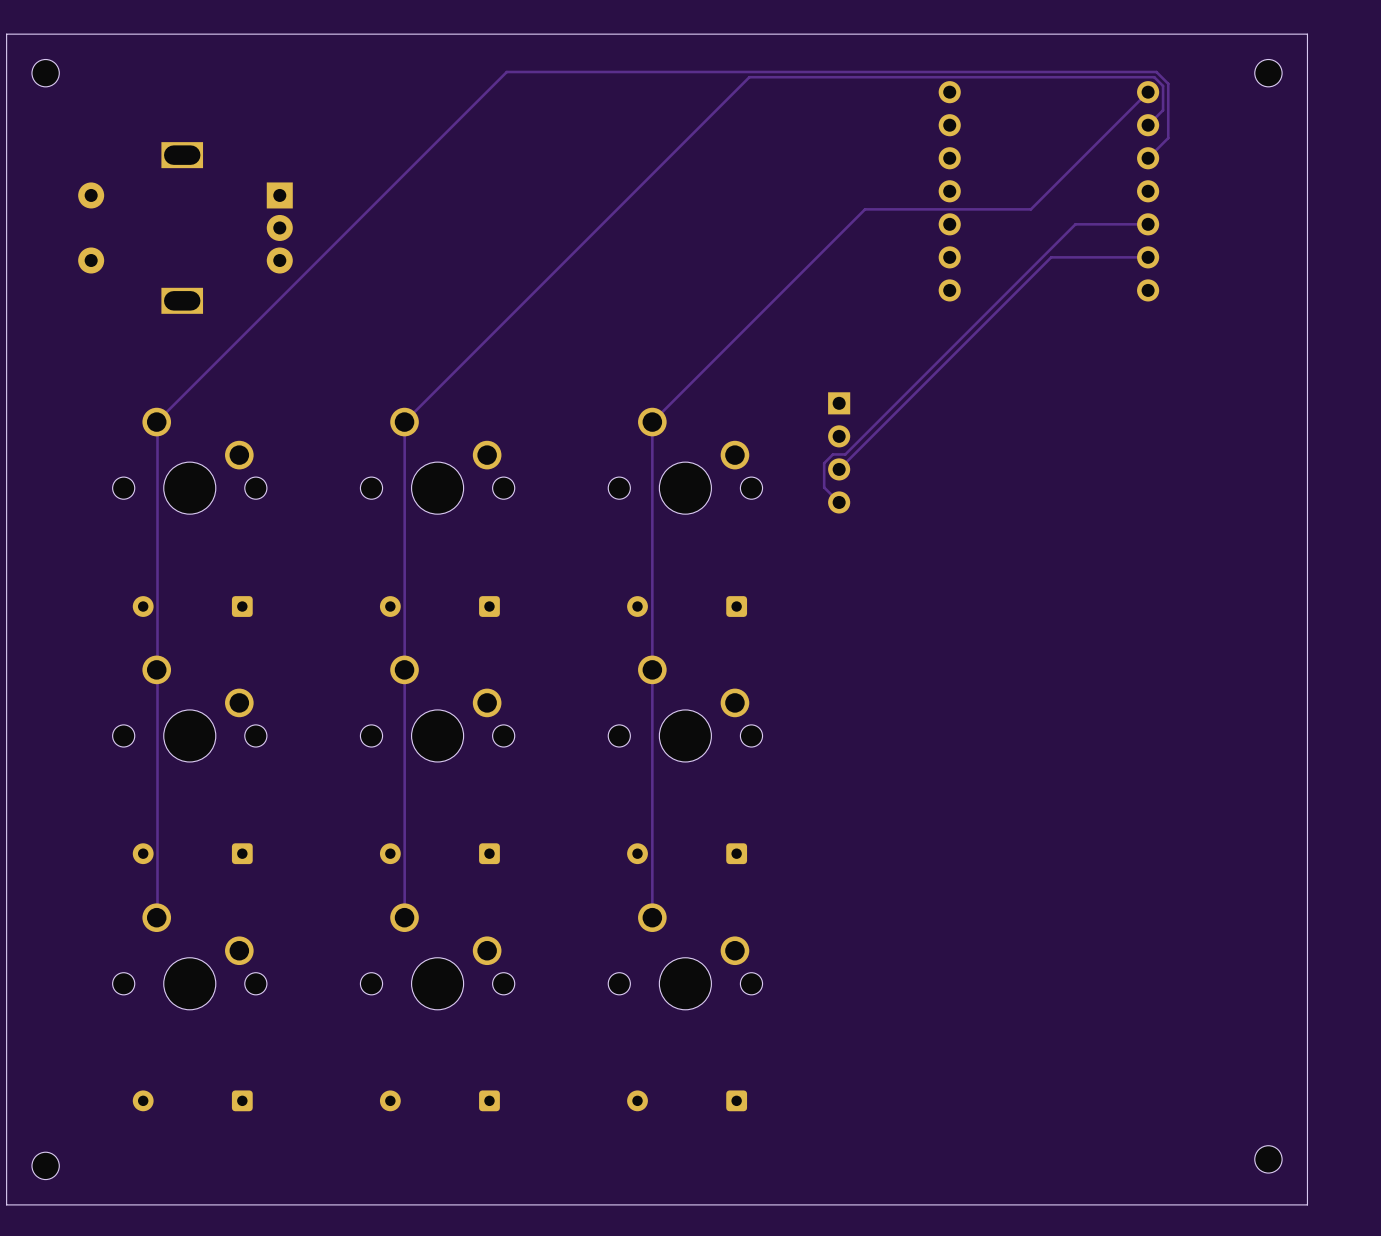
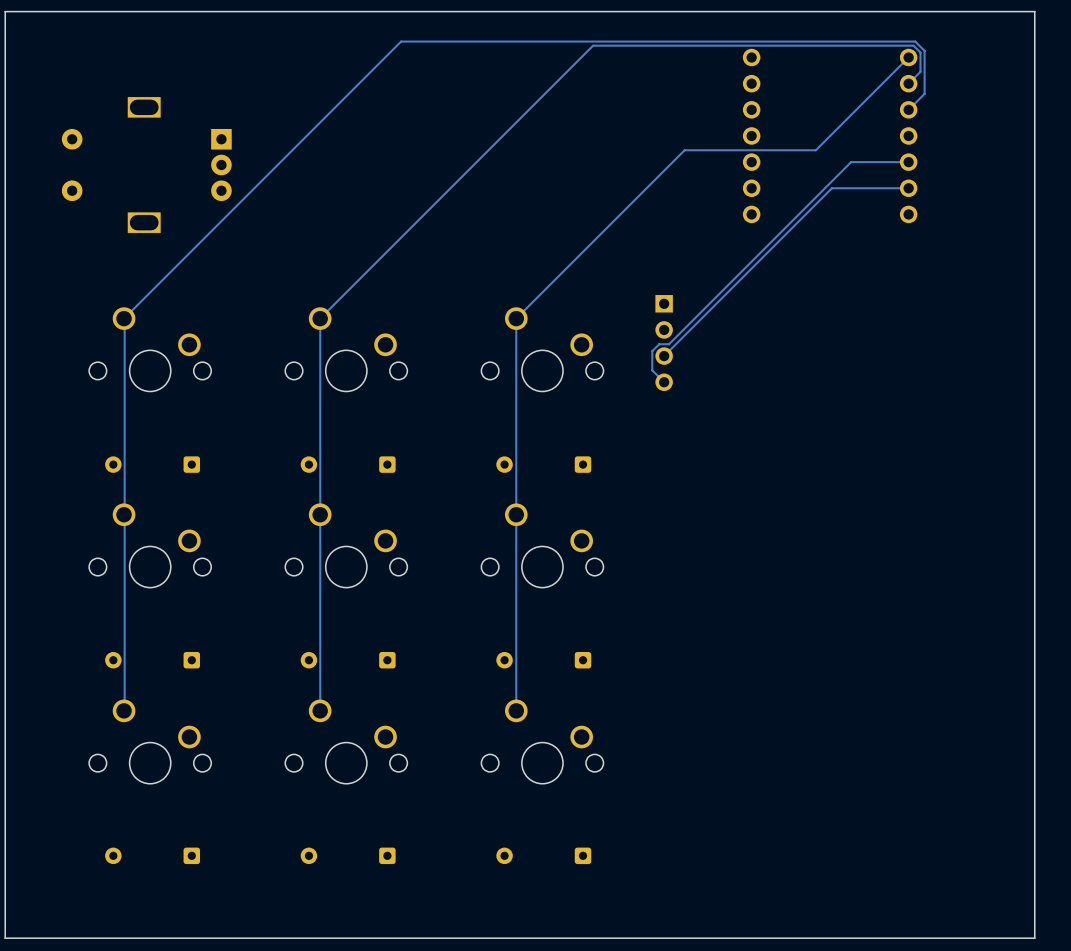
part: (45, 73) -> none
part: (1268, 73) -> none
part: (1268, 1159) -> none
part: (45, 1165) -> none

